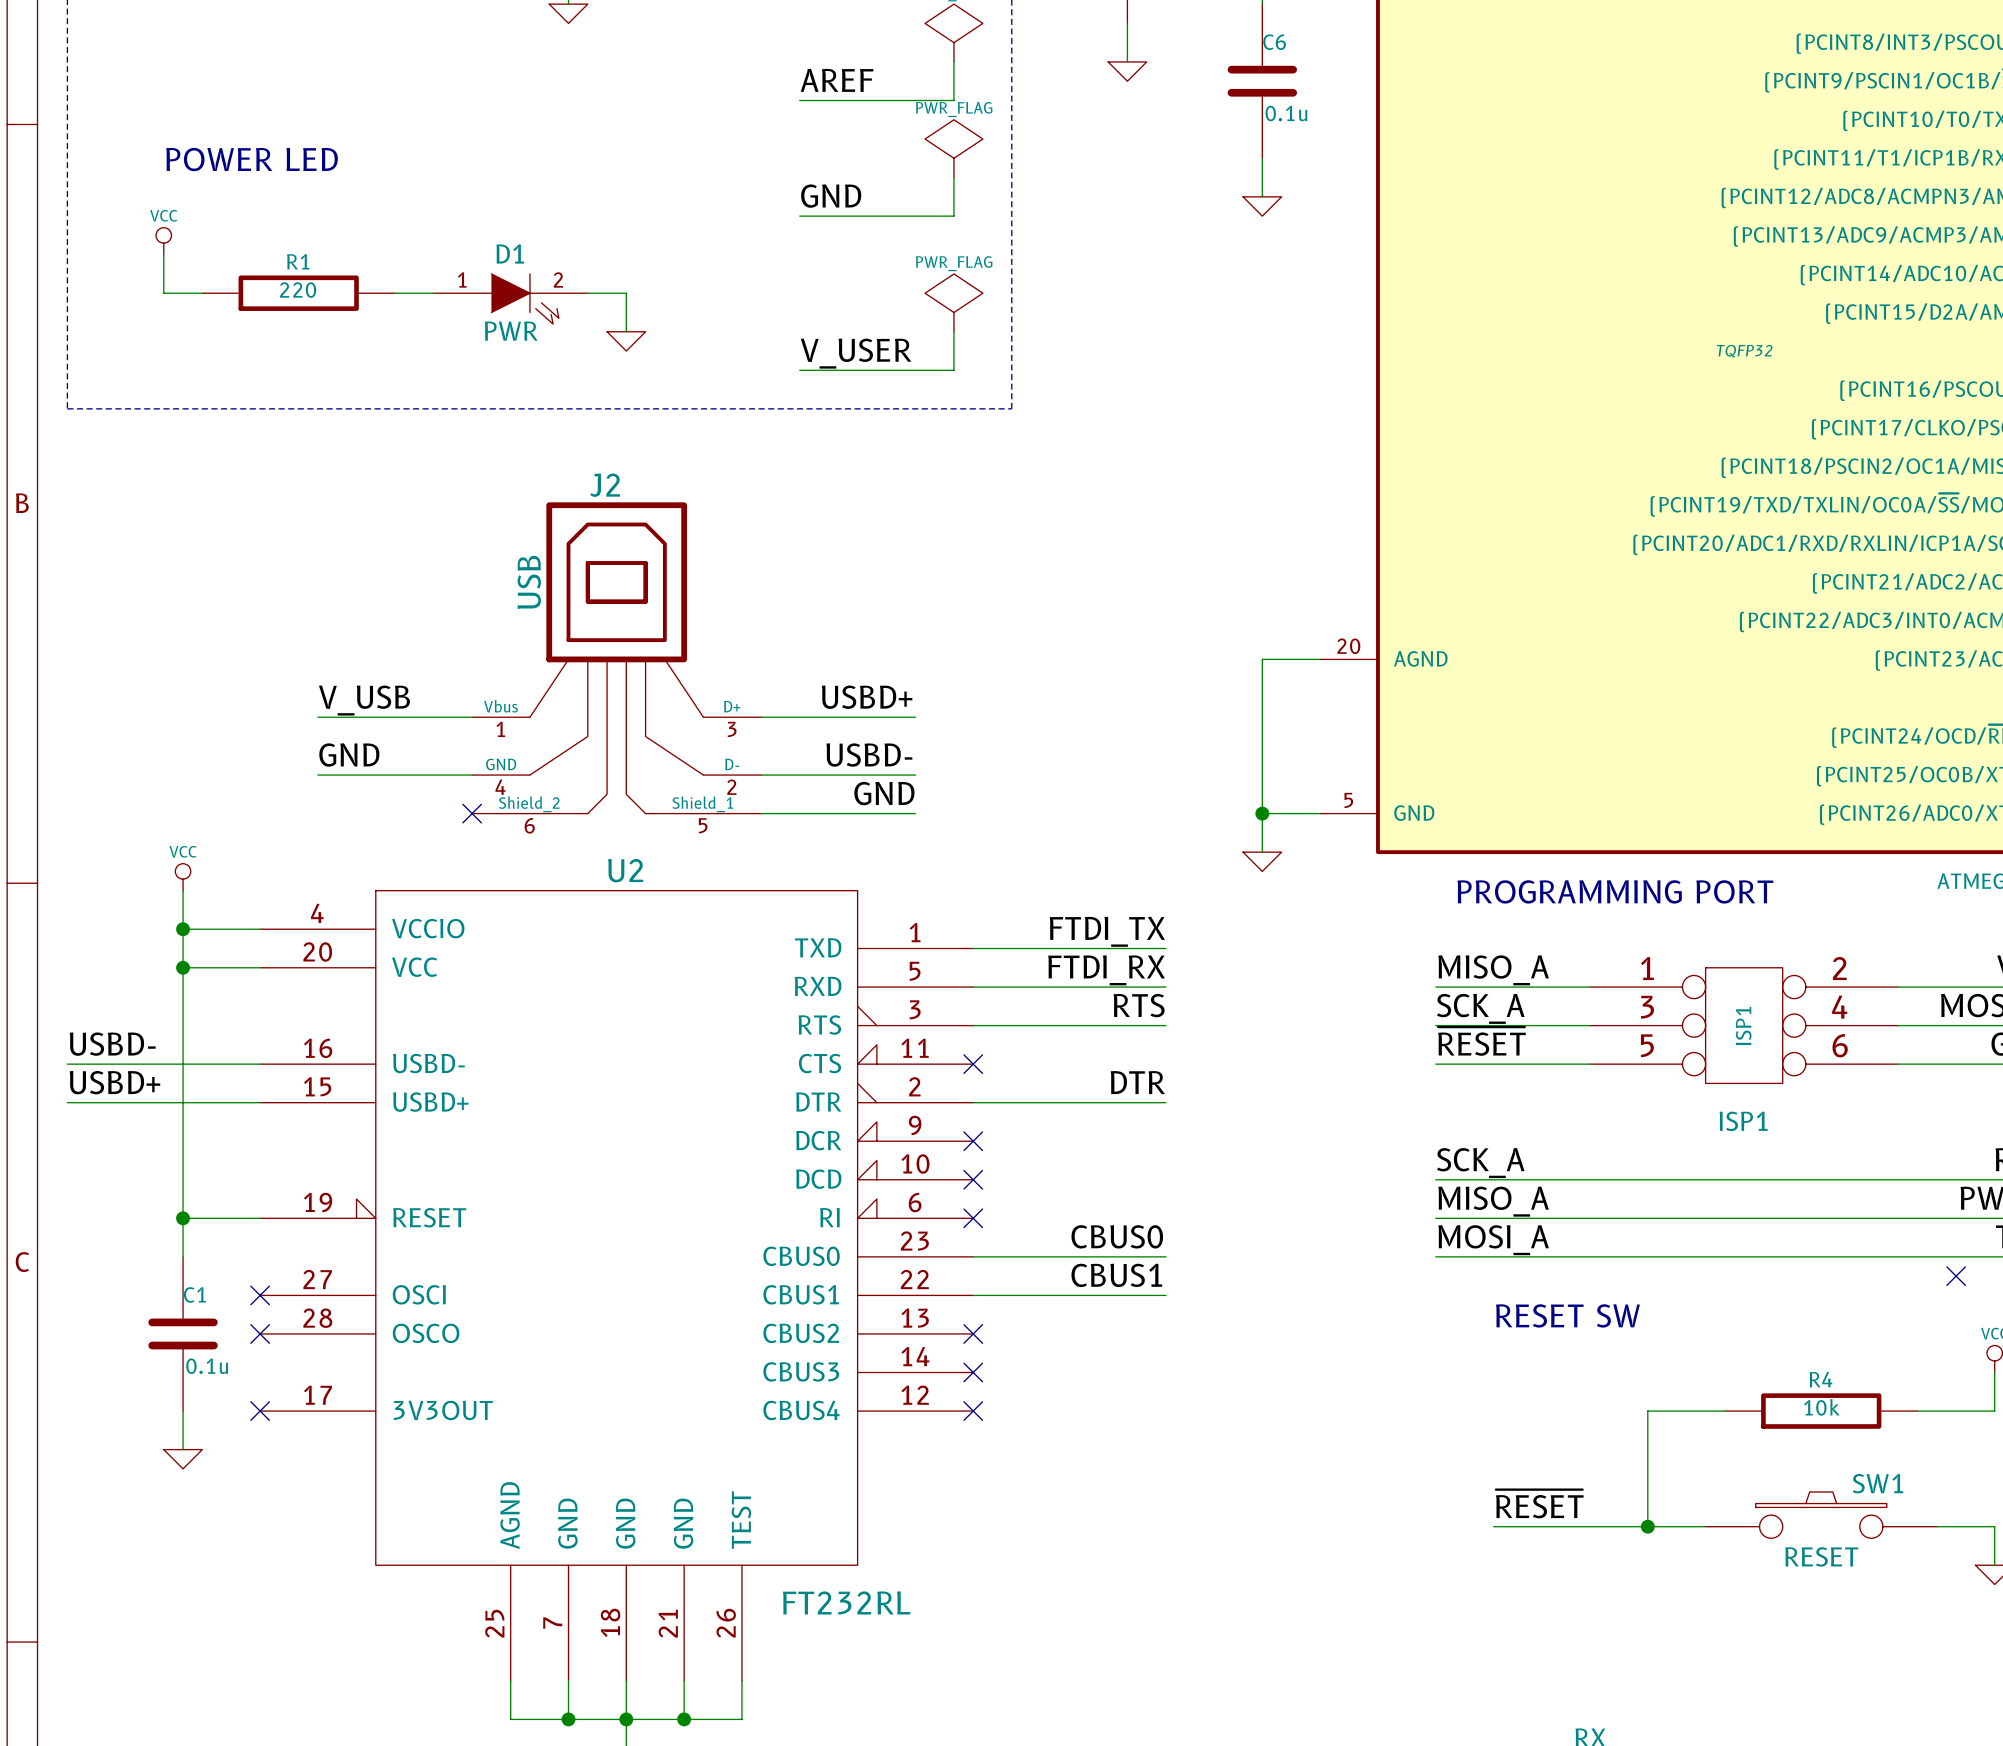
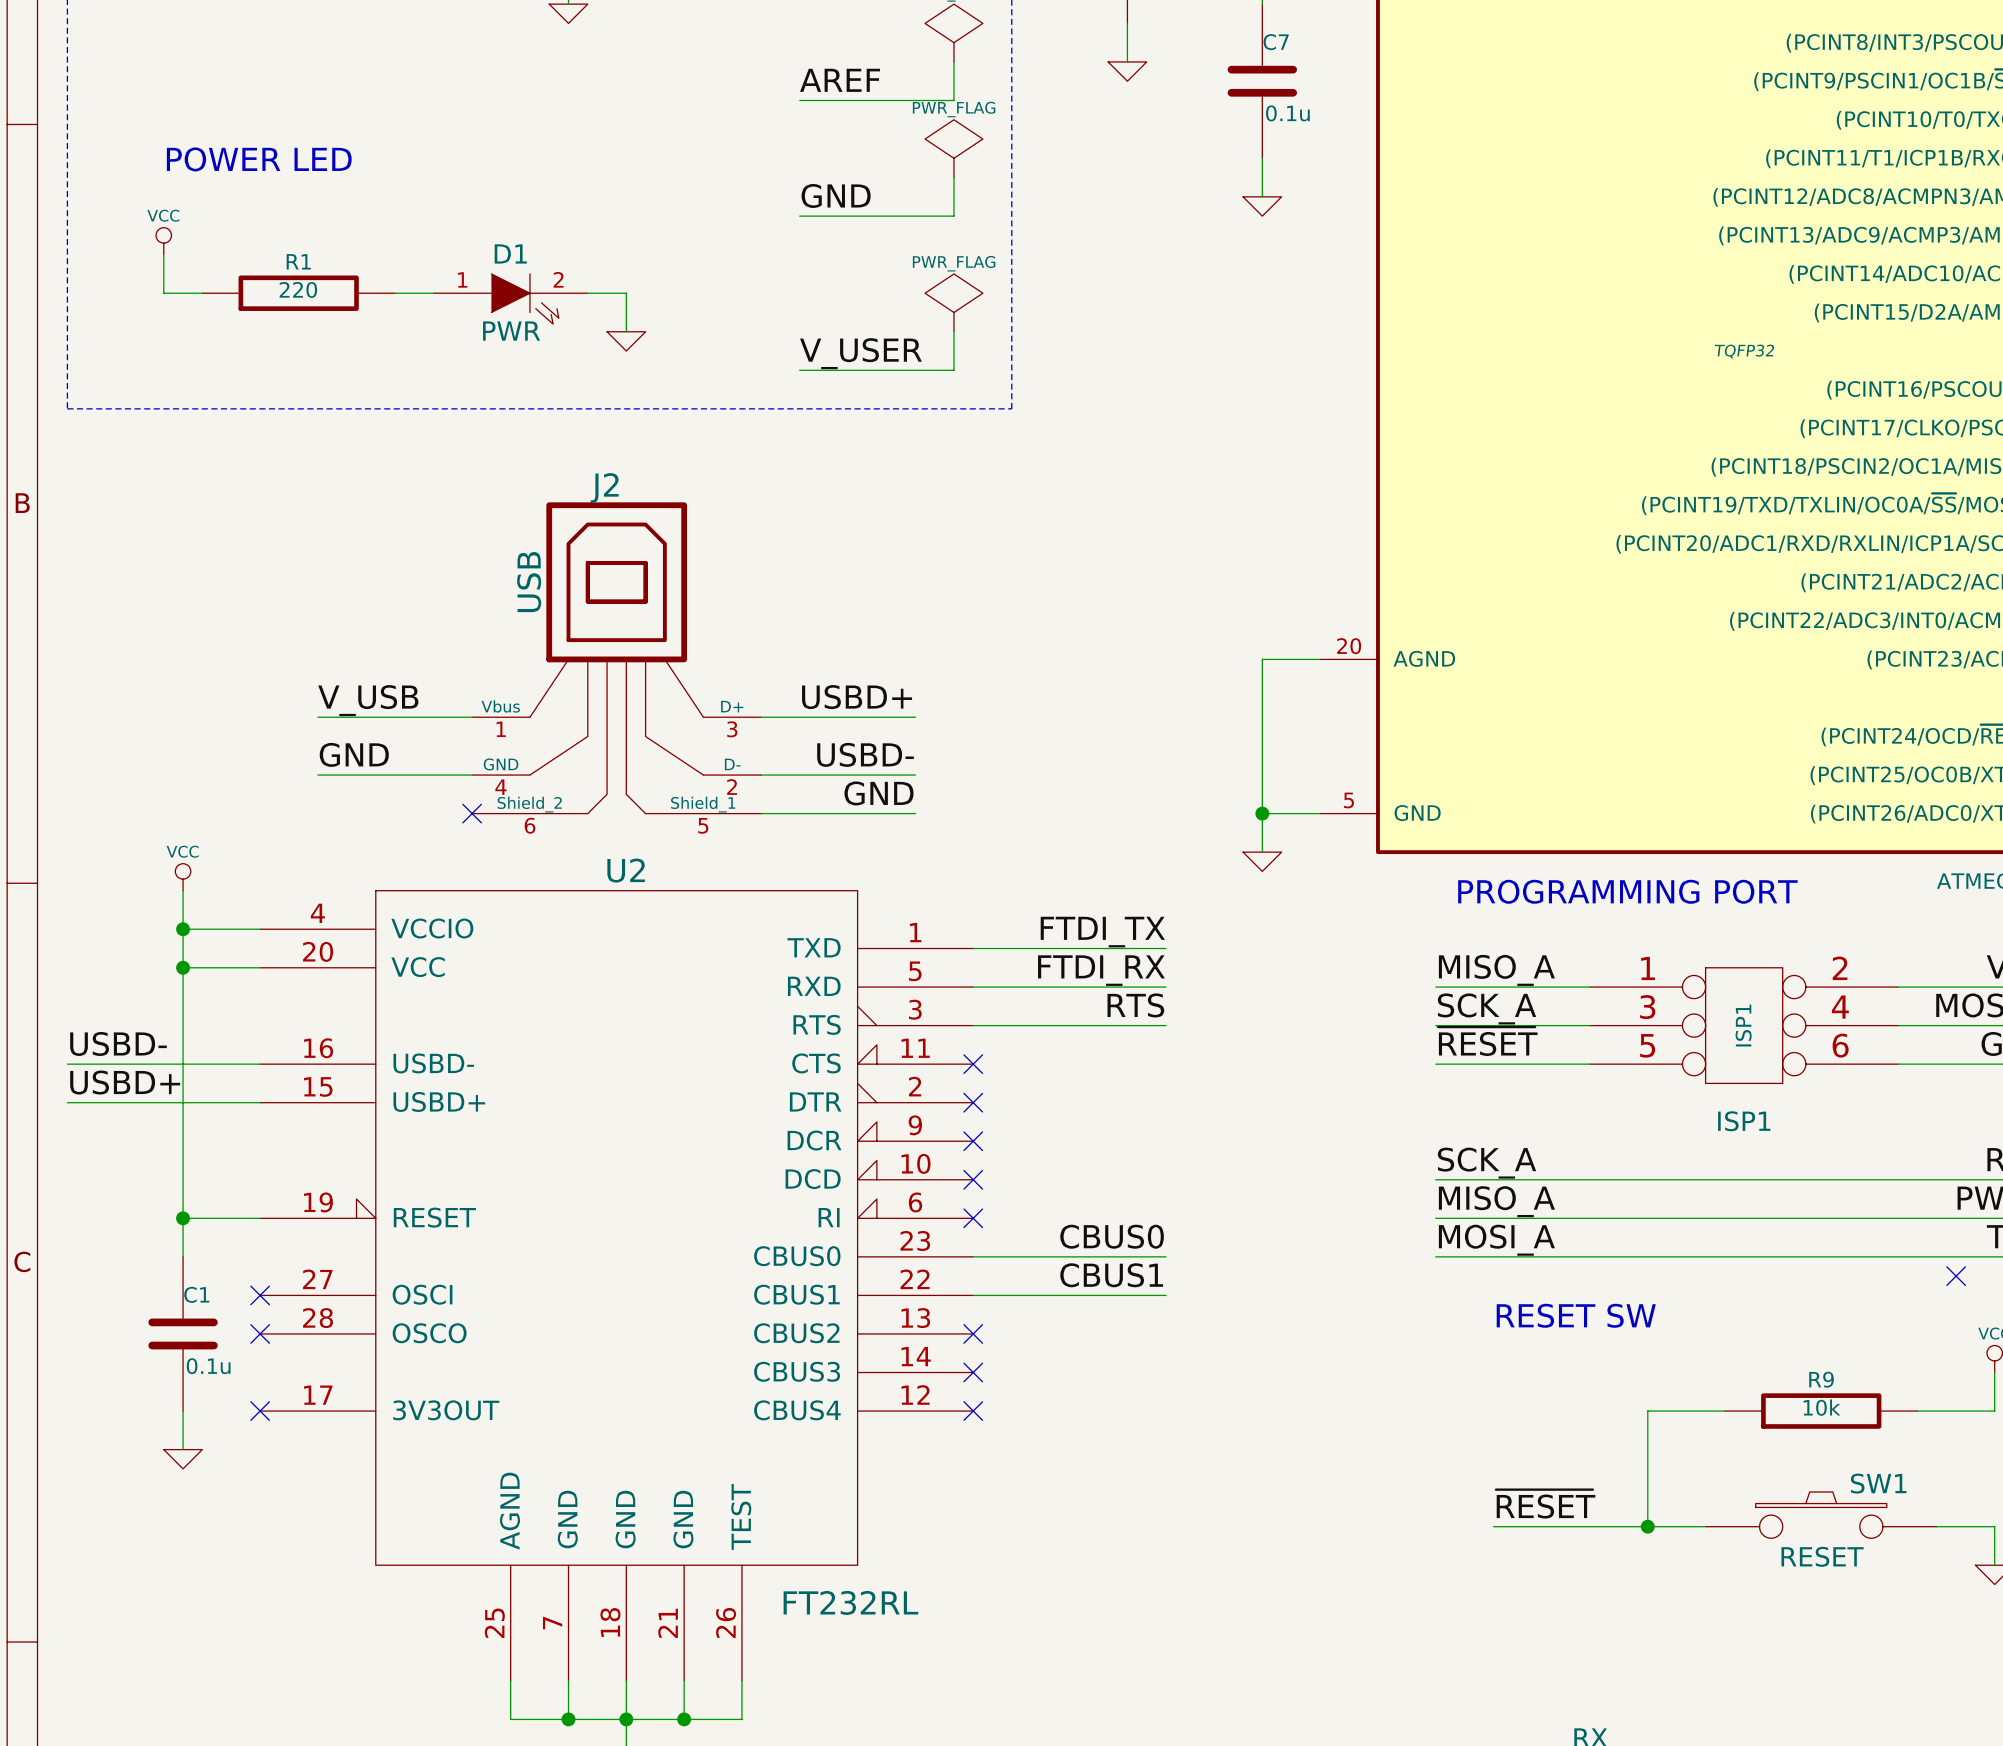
C6 name: C6 (1274, 42) -> C7 (1276, 42)
label: DTR (1137, 1082) -> none
wire: (973, 1102) (1165, 1102) -> none
no-connect mark: none -> (973, 1102)
R4 name: R4 (1821, 1379) -> R9 (1821, 1379)

